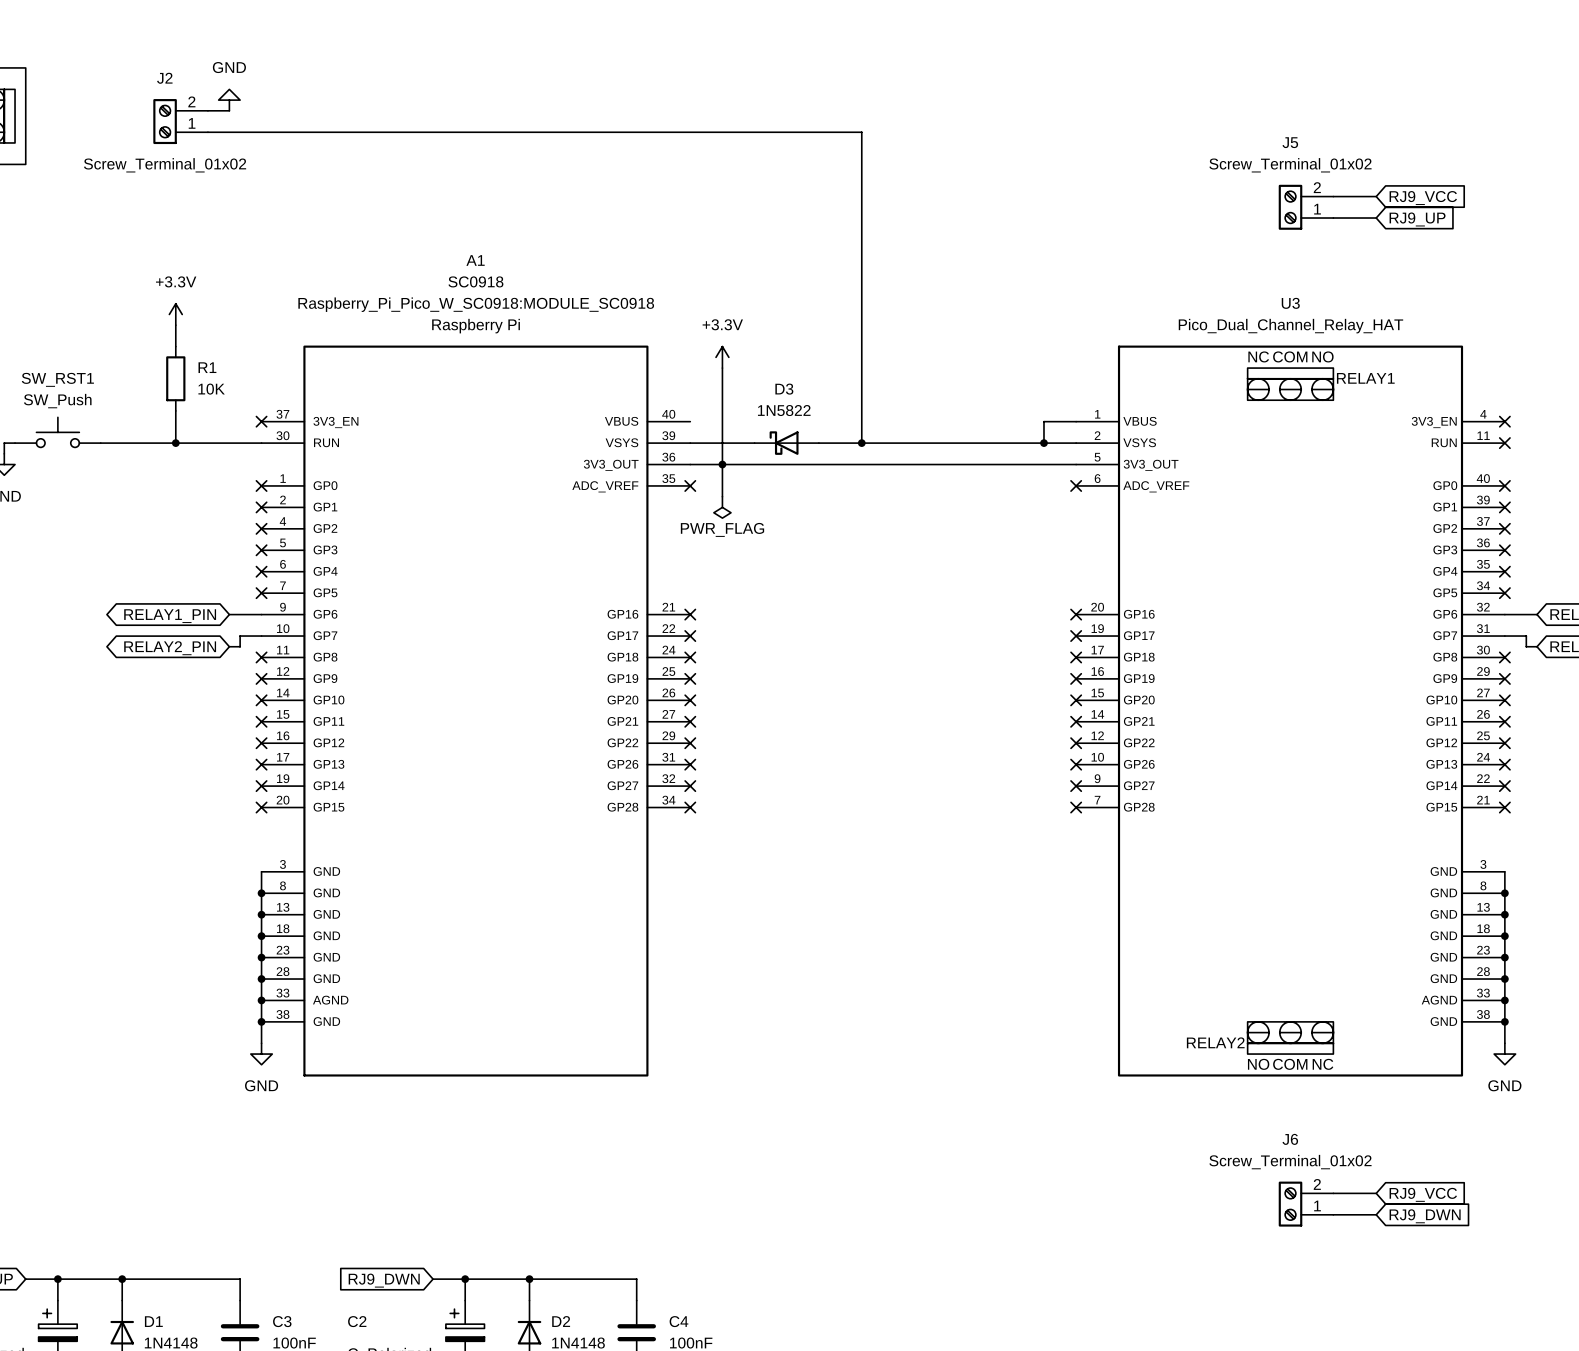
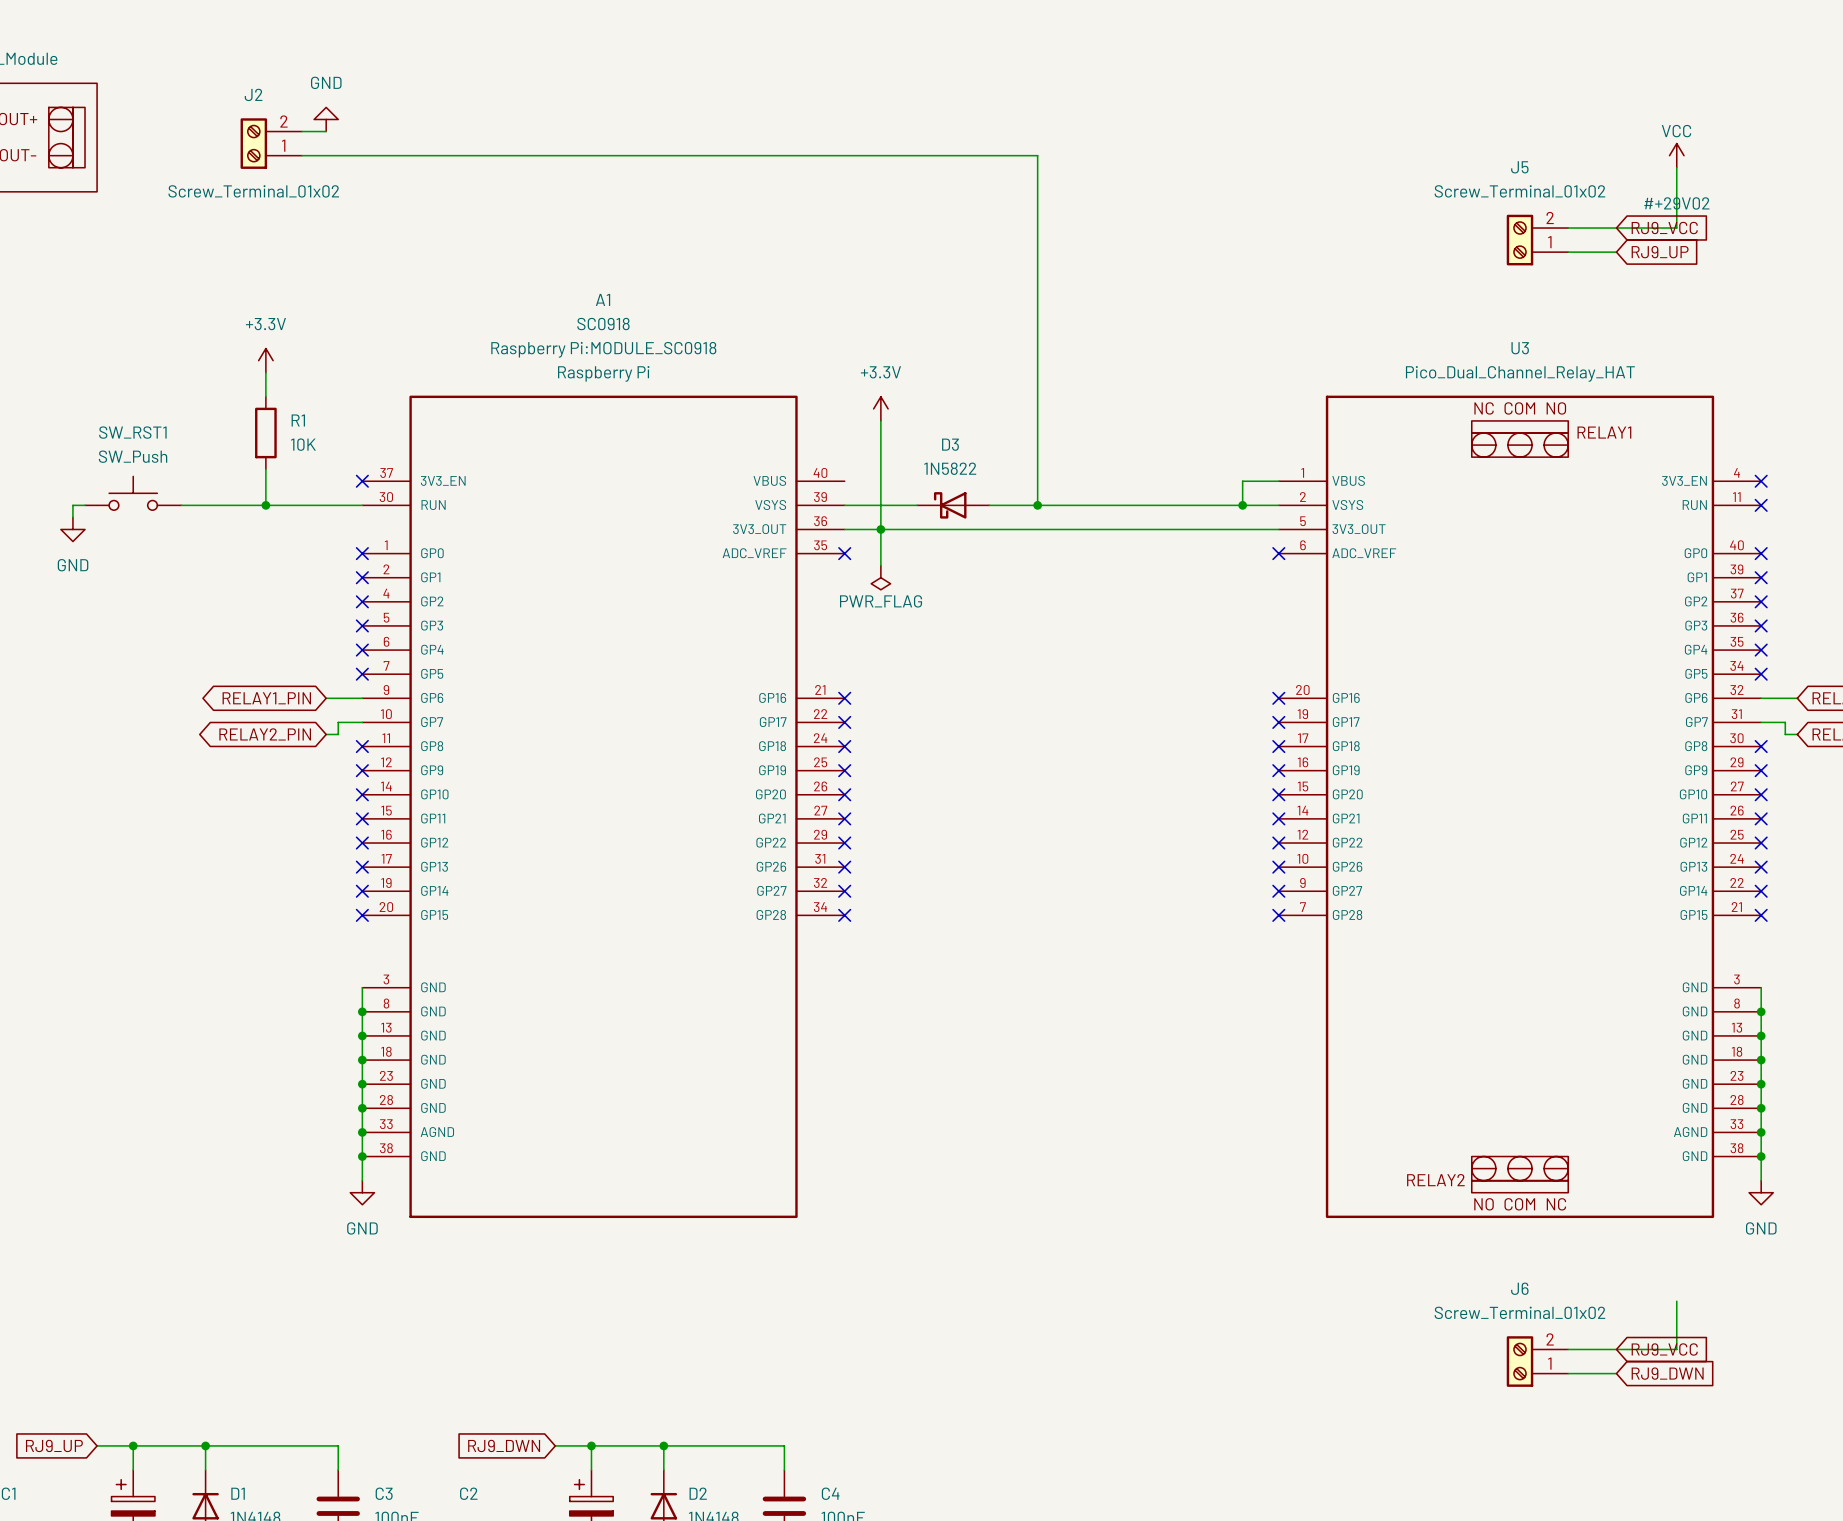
#+29V02: none -> VCC (1676, 155)
wire: none -> (1676, 167) (1676, 228) (1616, 228)
A1 text: Raspberry_Pi_Pico_W_SC0918:MODULE_SC0918 (476, 304) -> Raspberry Pi:MODULE_SC0918 (603, 349)
wire: none -> (1676, 1301) (1676, 1349) (1616, 1349)

